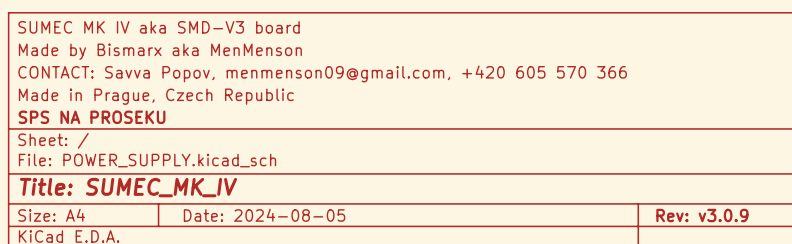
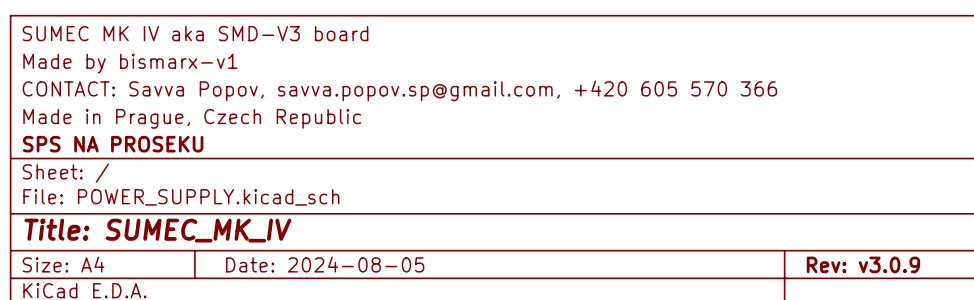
title block: Made by Bismarx aka MenMenson (160, 51) -> Made by bismarx-v1 (130, 63)
title block: CONTACT: Savva Popov, menmenson09@gmail.com, +420 605 570 366 (322, 73) -> CONTACT: Savva Popov, savva.popov.sp@gmail.com, +420 605 570 366 (399, 90)

